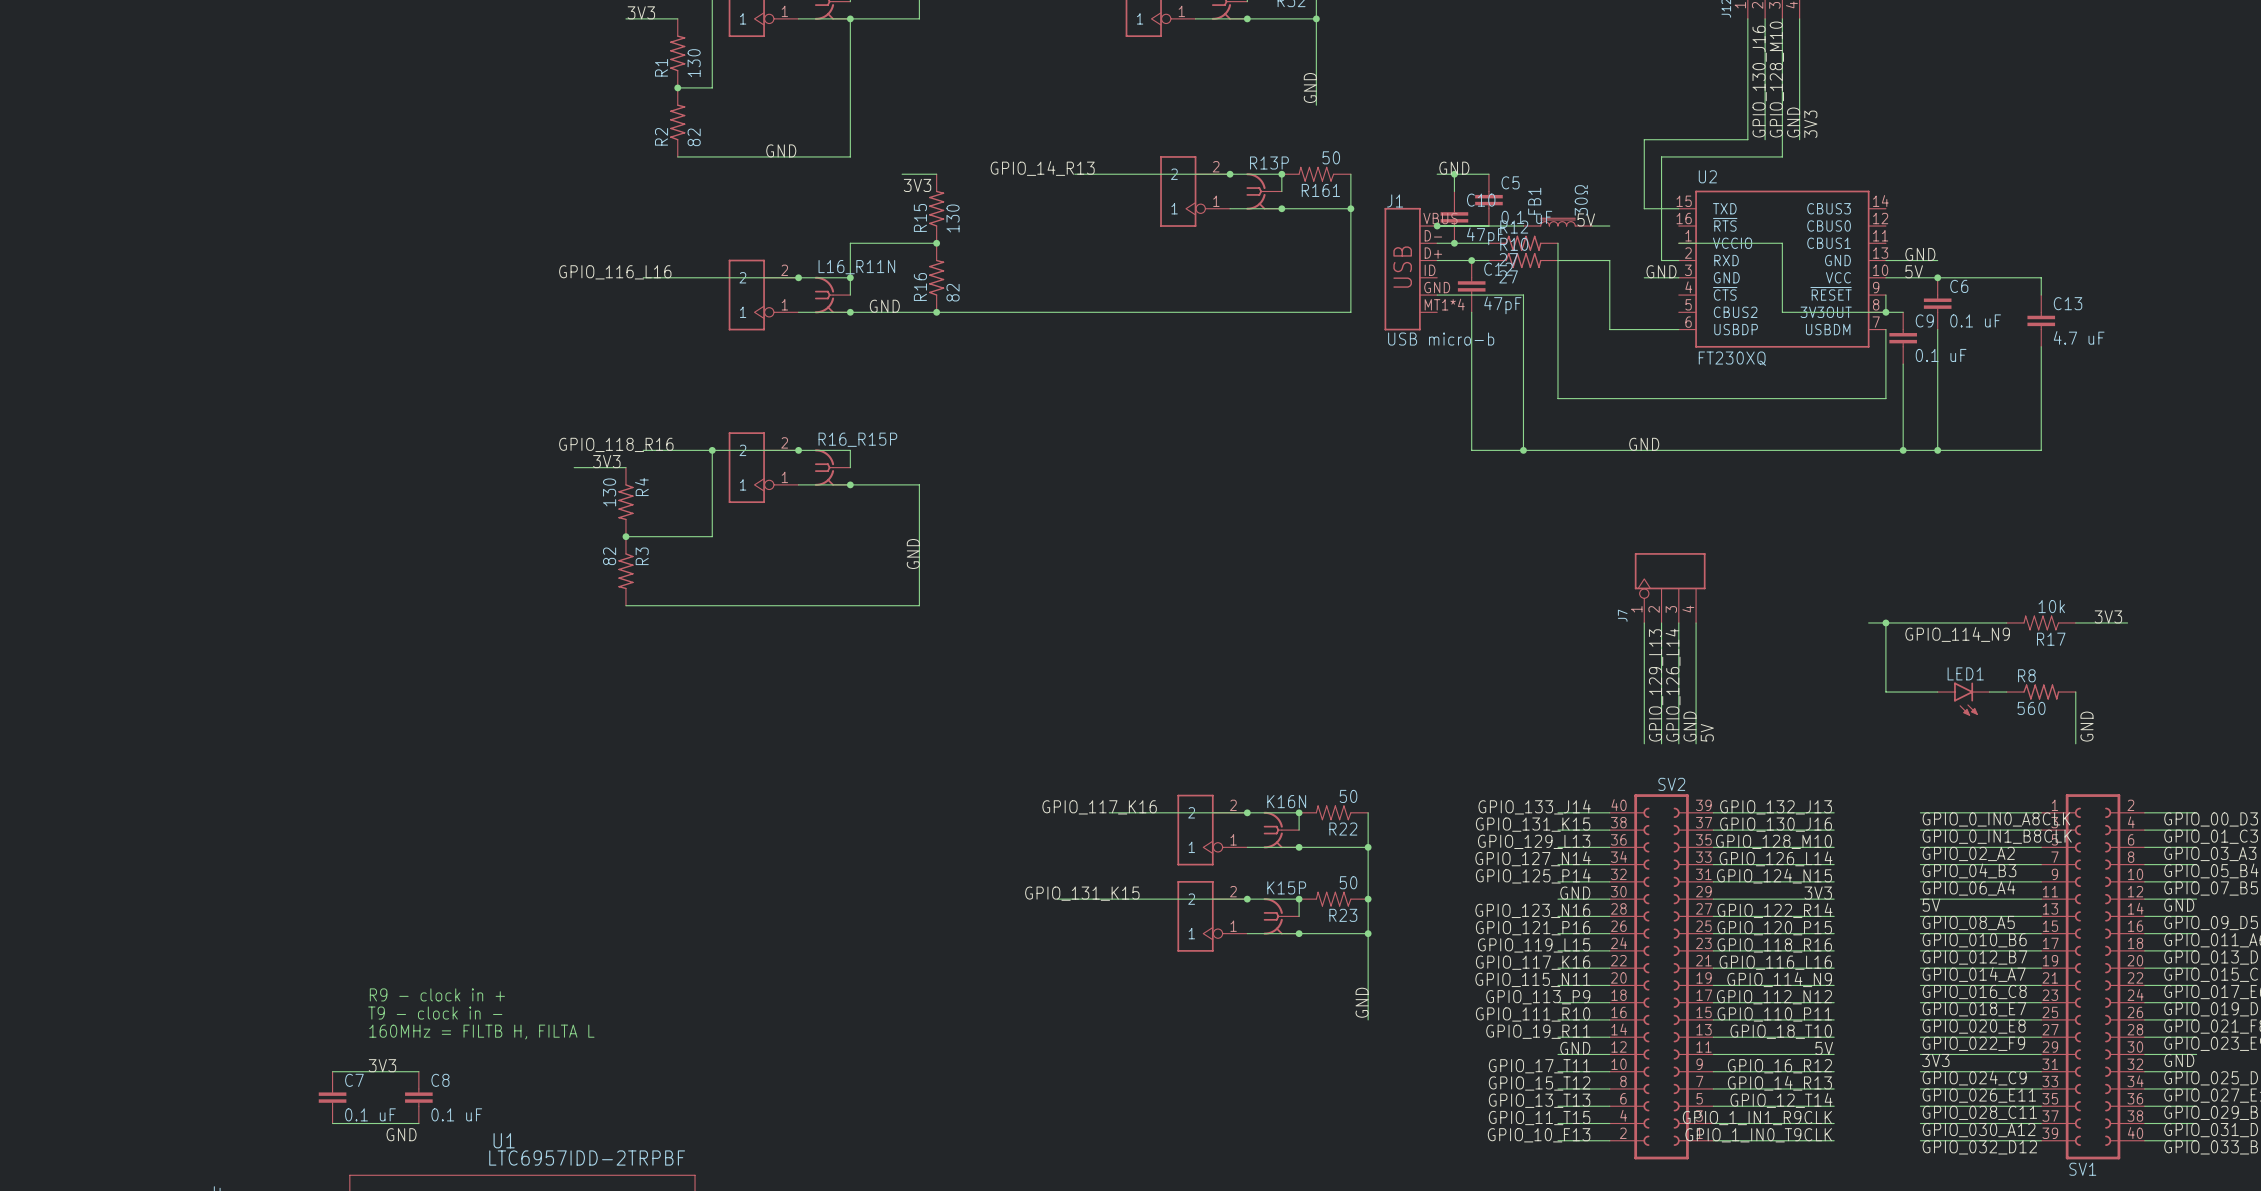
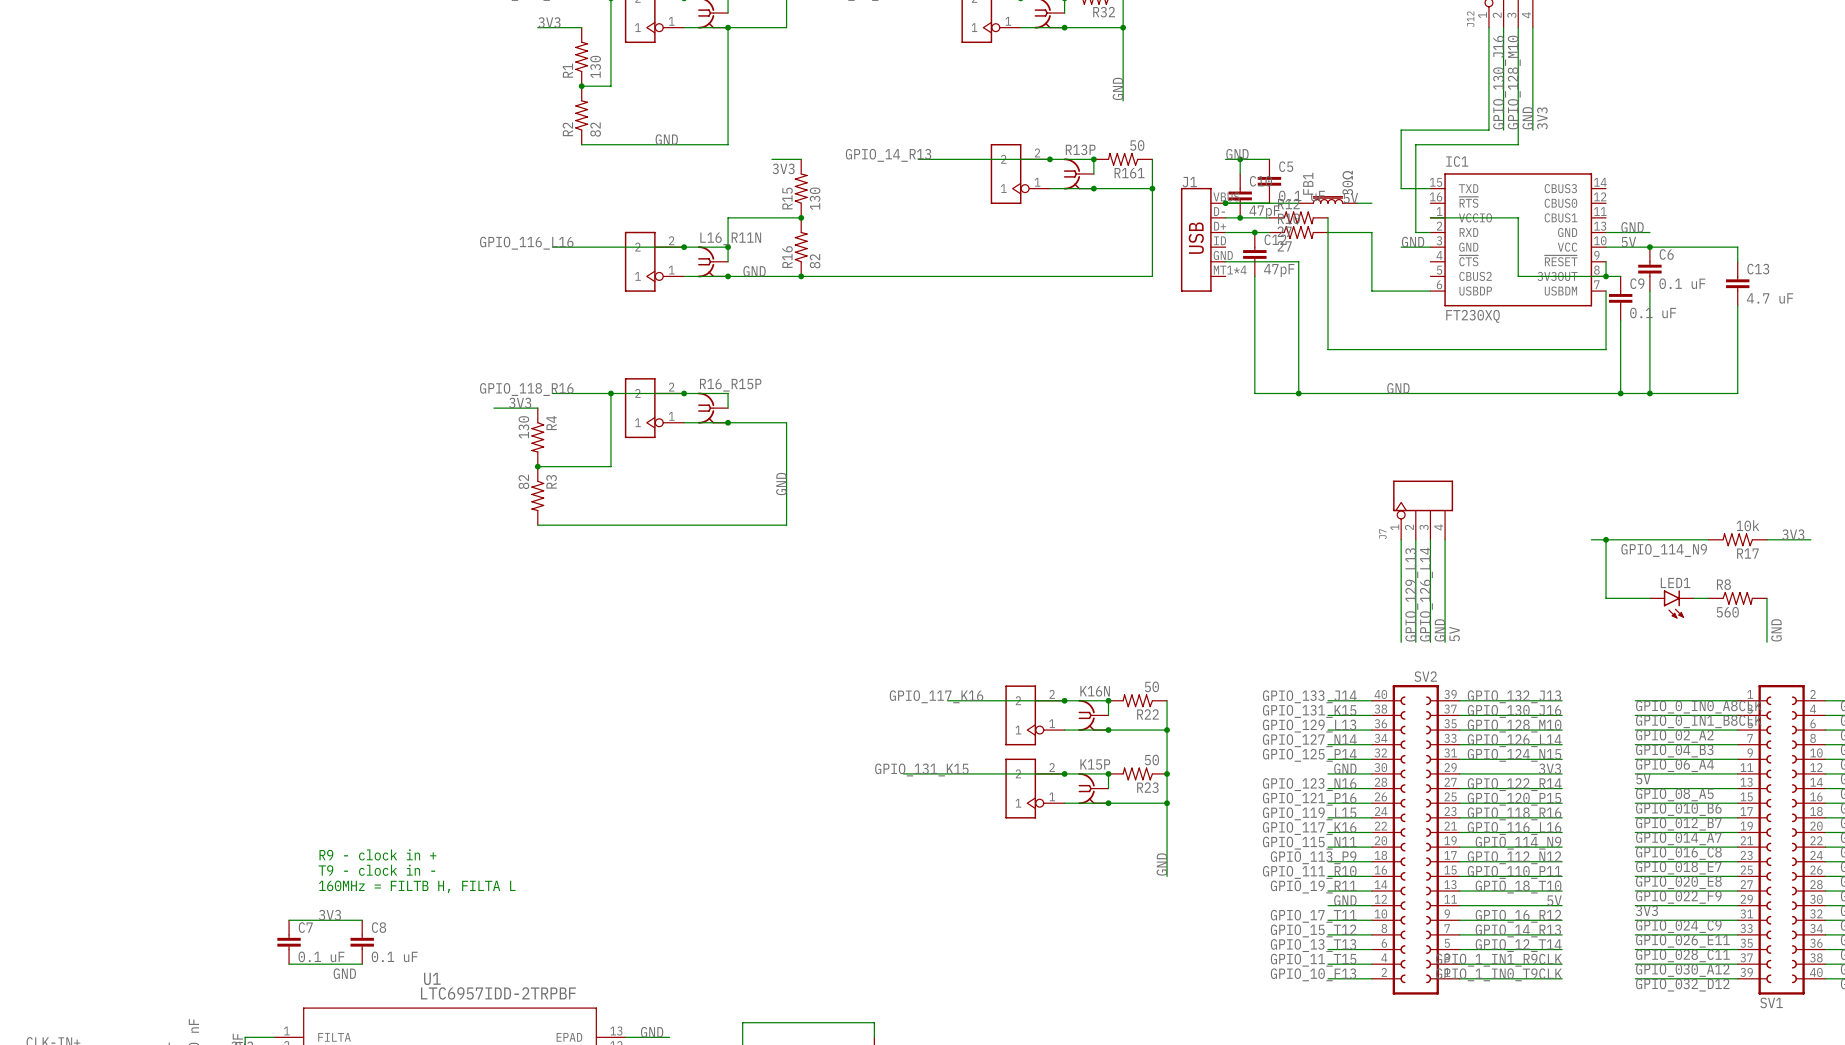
U2 name: U2 (1707, 176) -> IC1 (1457, 161)
J1 value: USB micro-b (1441, 339) -> none

